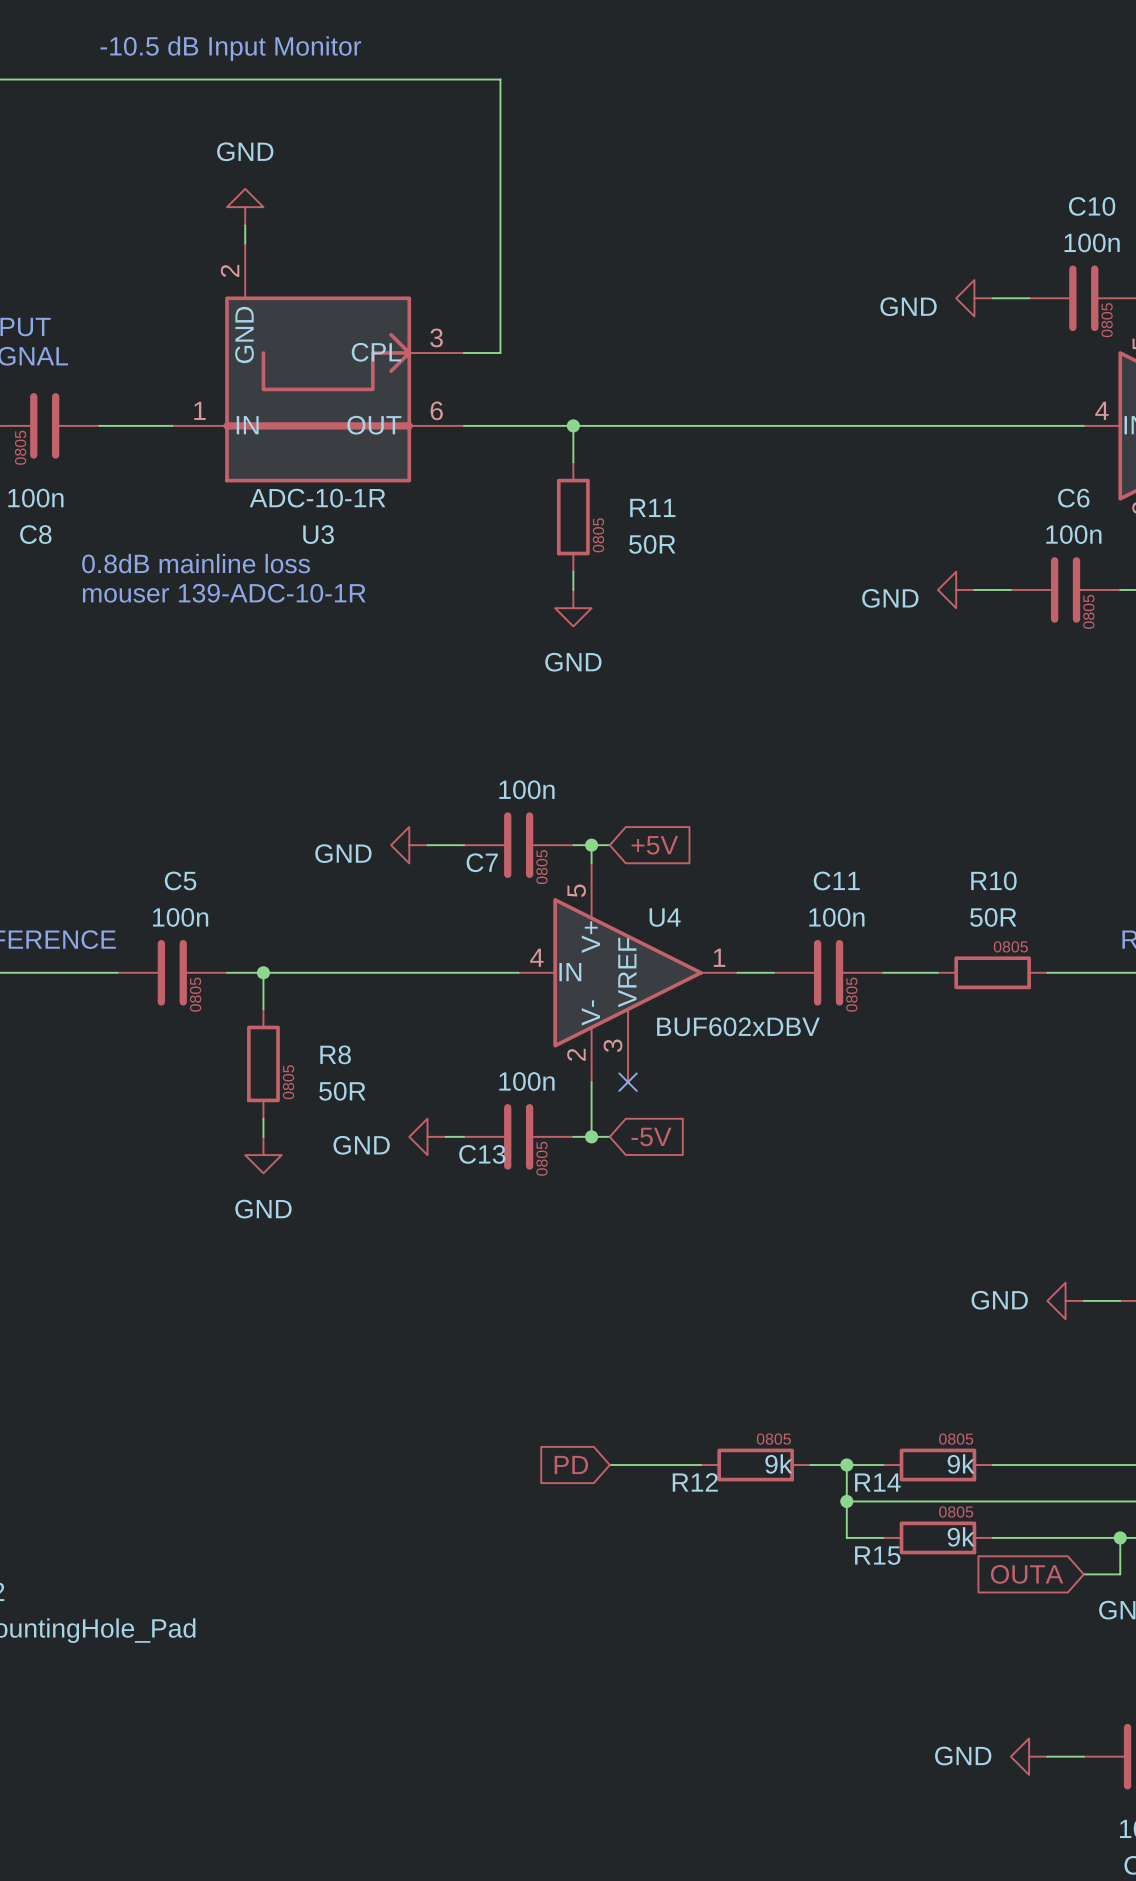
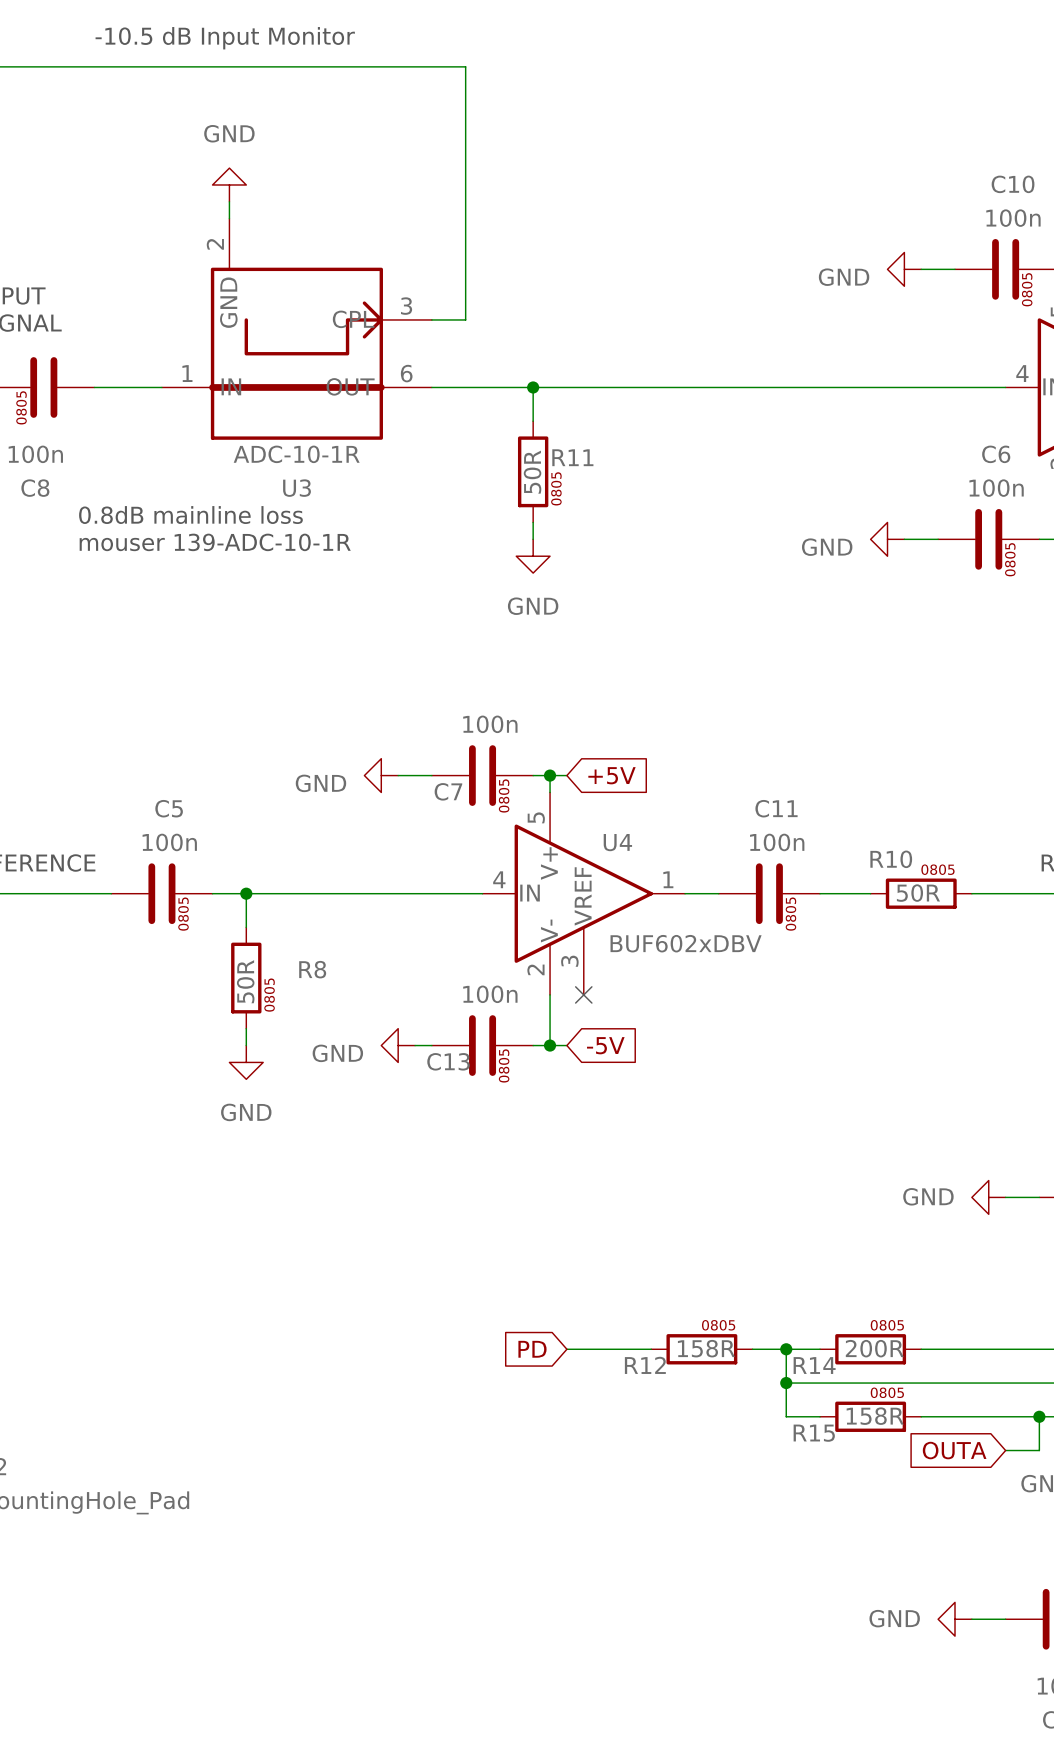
R11 name position: R11 (652, 507) -> R11 (572, 457)
R11 value rotation: 0° (652, 544) -> 90° counterclockwise (532, 472)
R11 value position: 50R (652, 544) -> 50R (532, 472)
R10 name position: R10 (993, 880) -> R10 (891, 859)
R10 value position: 50R (993, 917) -> 50R (918, 893)
R8 value rotation: 0° (342, 1091) -> 90° counterclockwise (245, 981)
R8 value position: 50R (342, 1091) -> 50R (245, 981)
R12 value: 9k (778, 1463) -> 158R (706, 1348)
R14 value: 9k (961, 1463) -> 200R (874, 1348)
R15 value: 9k (961, 1536) -> 158R (875, 1416)

